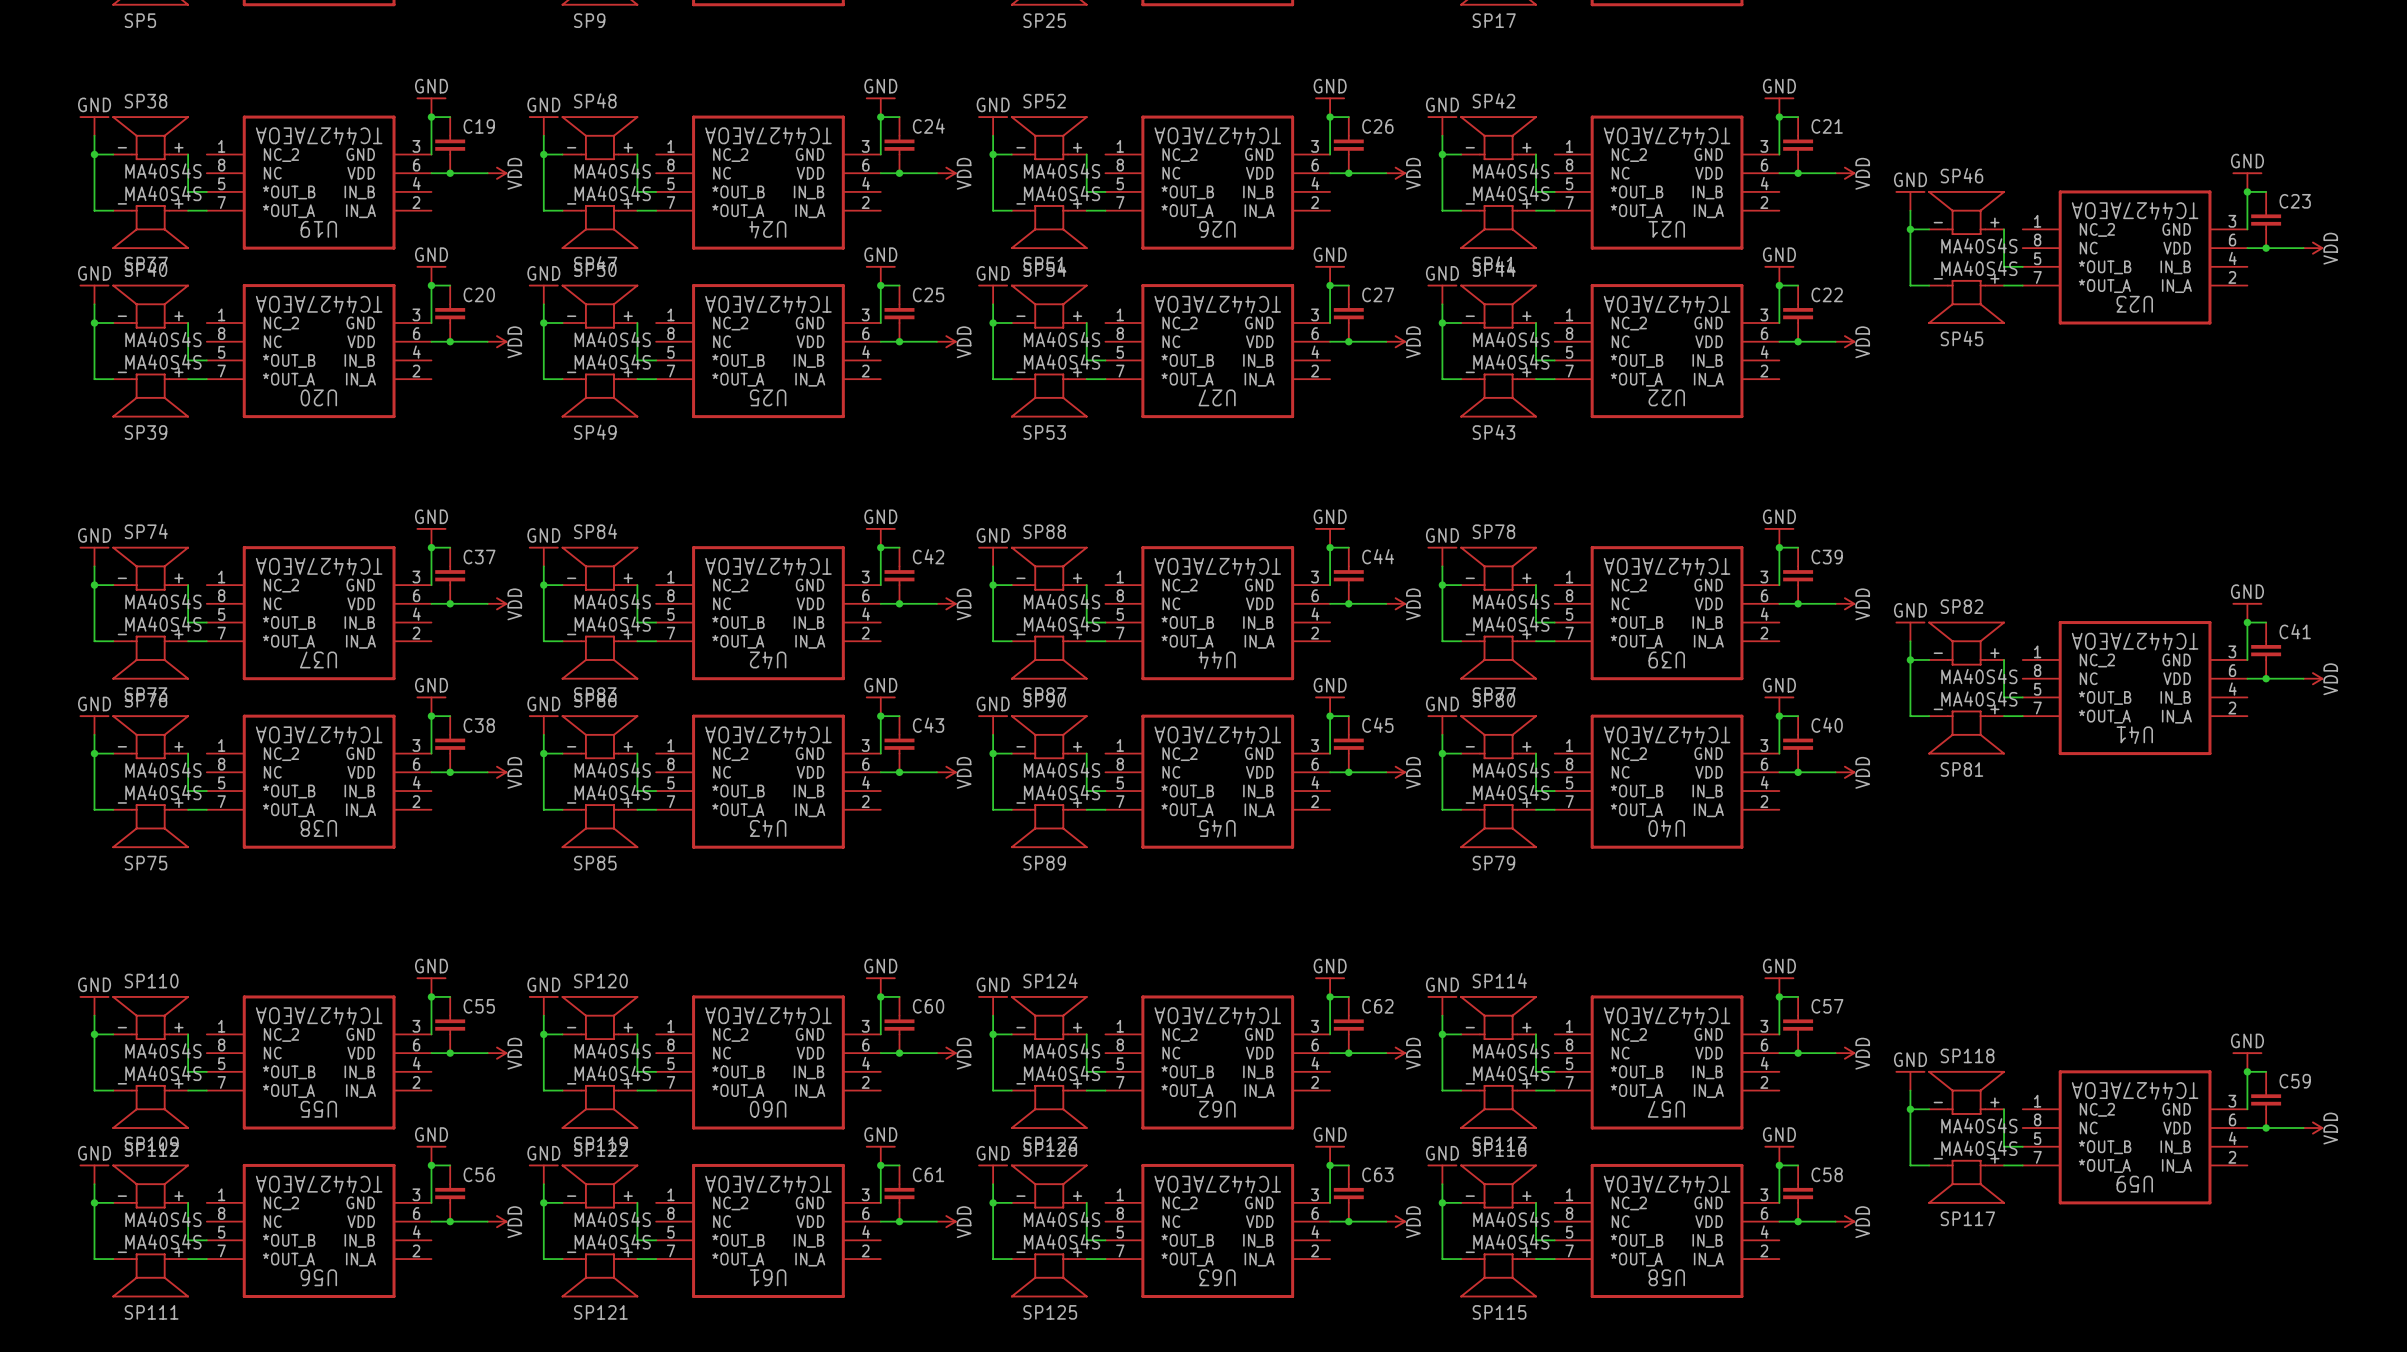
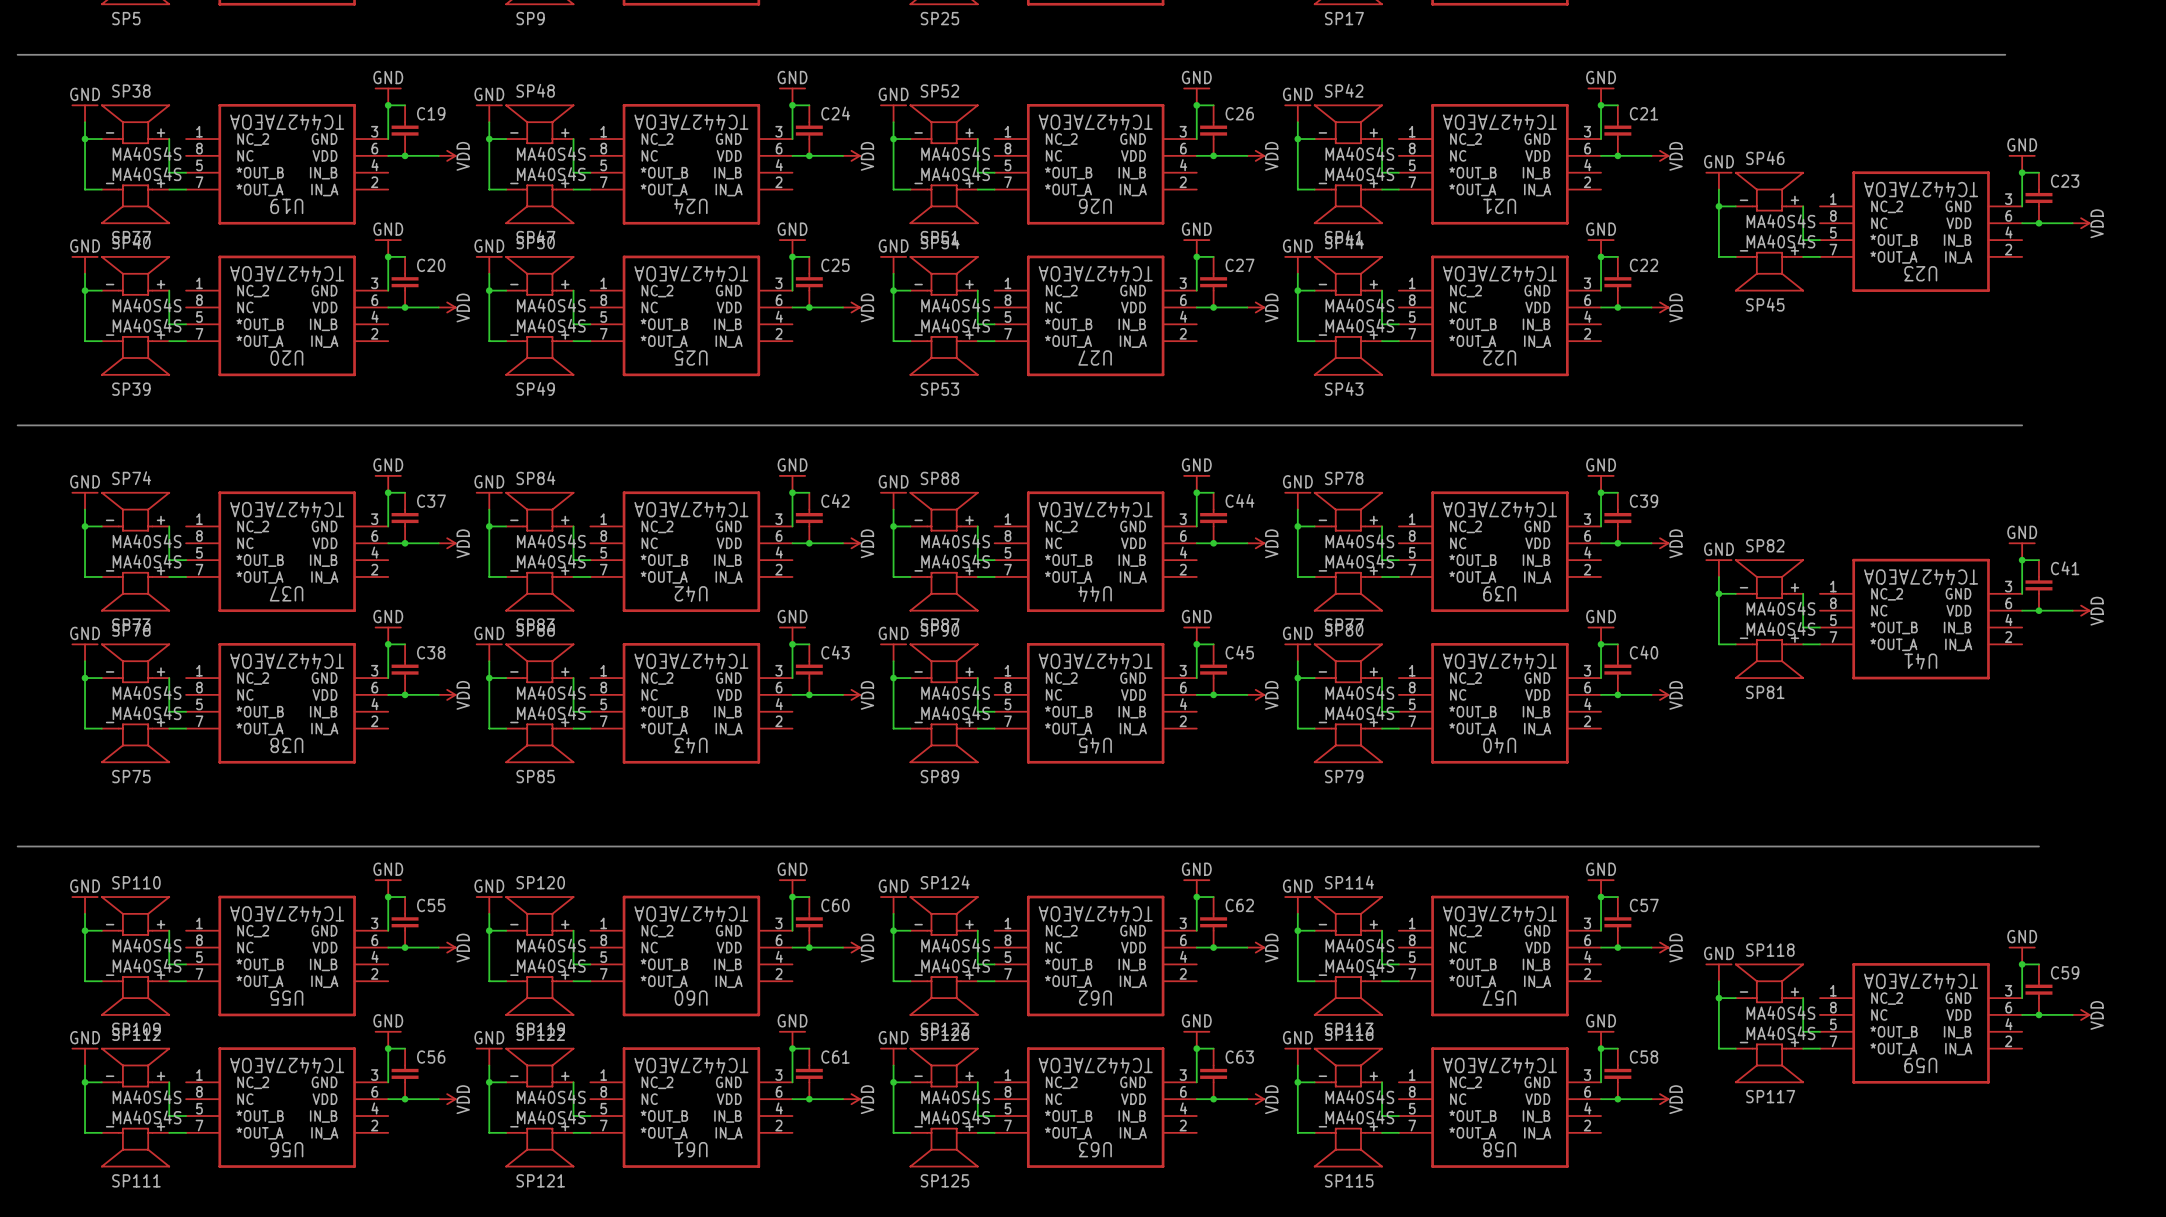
bus: none -> (17, 54) (2005, 54)
bus: none -> (17, 425) (2022, 425)
bus: none -> (17, 846) (2038, 846)

